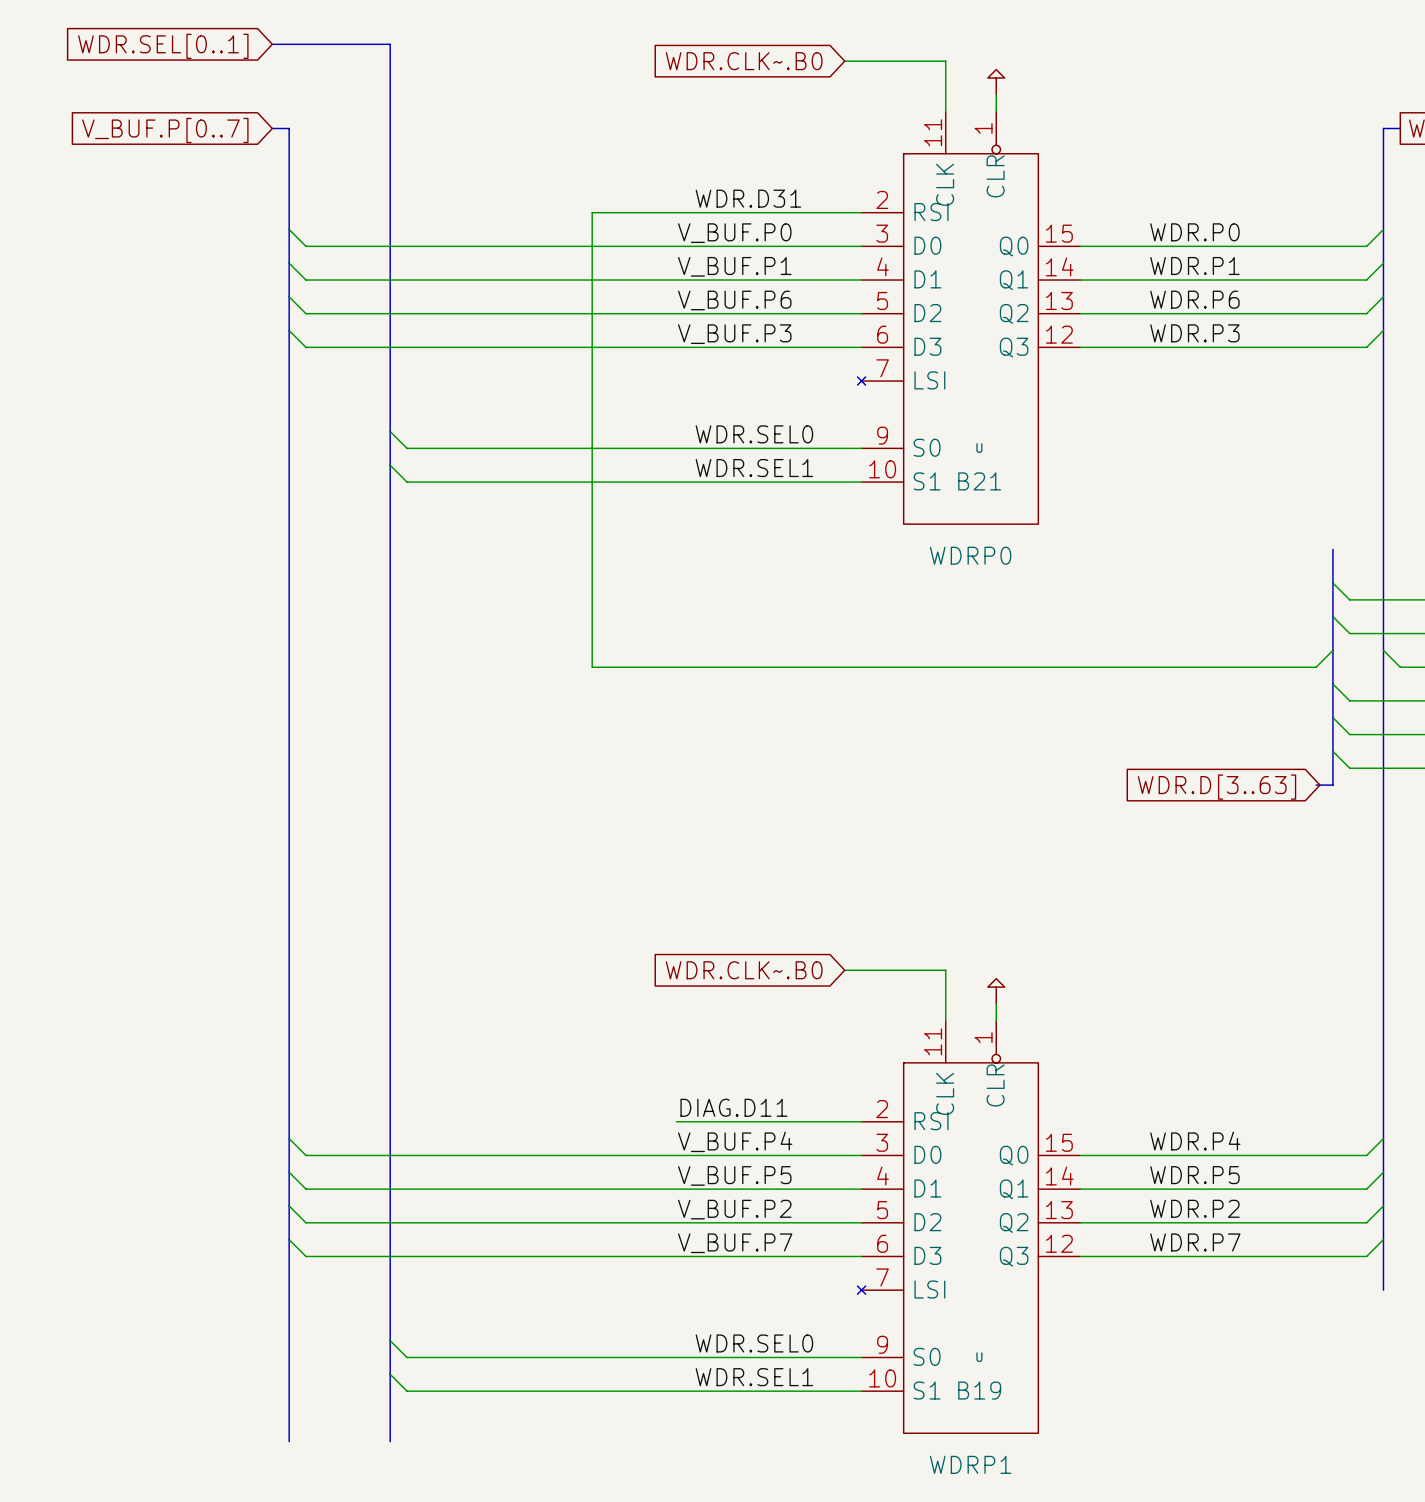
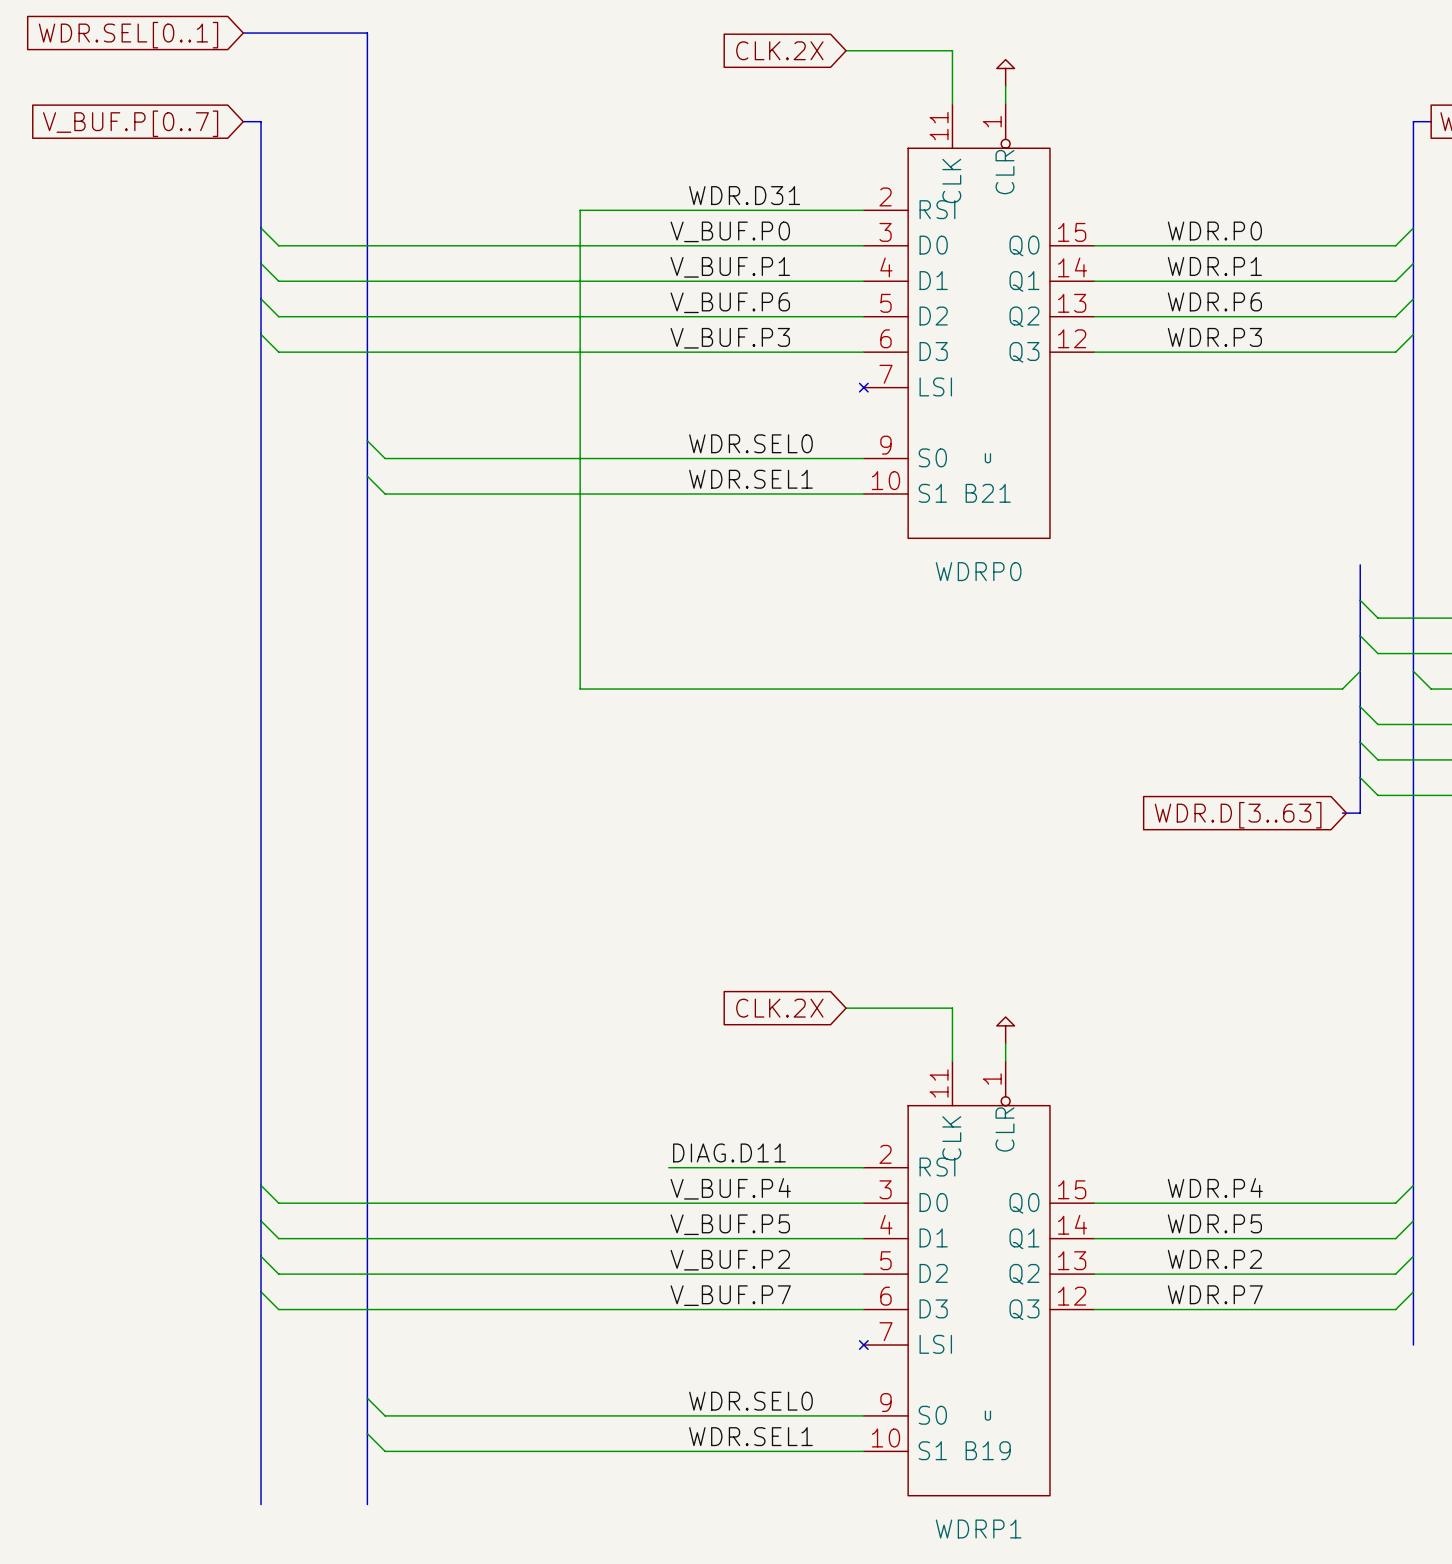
global label: WDR.CLK~.B0 (744, 61) -> CLK.2X (779, 50)
global label: WDR.CLK~.B0 (744, 970) -> CLK.2X (779, 1008)

